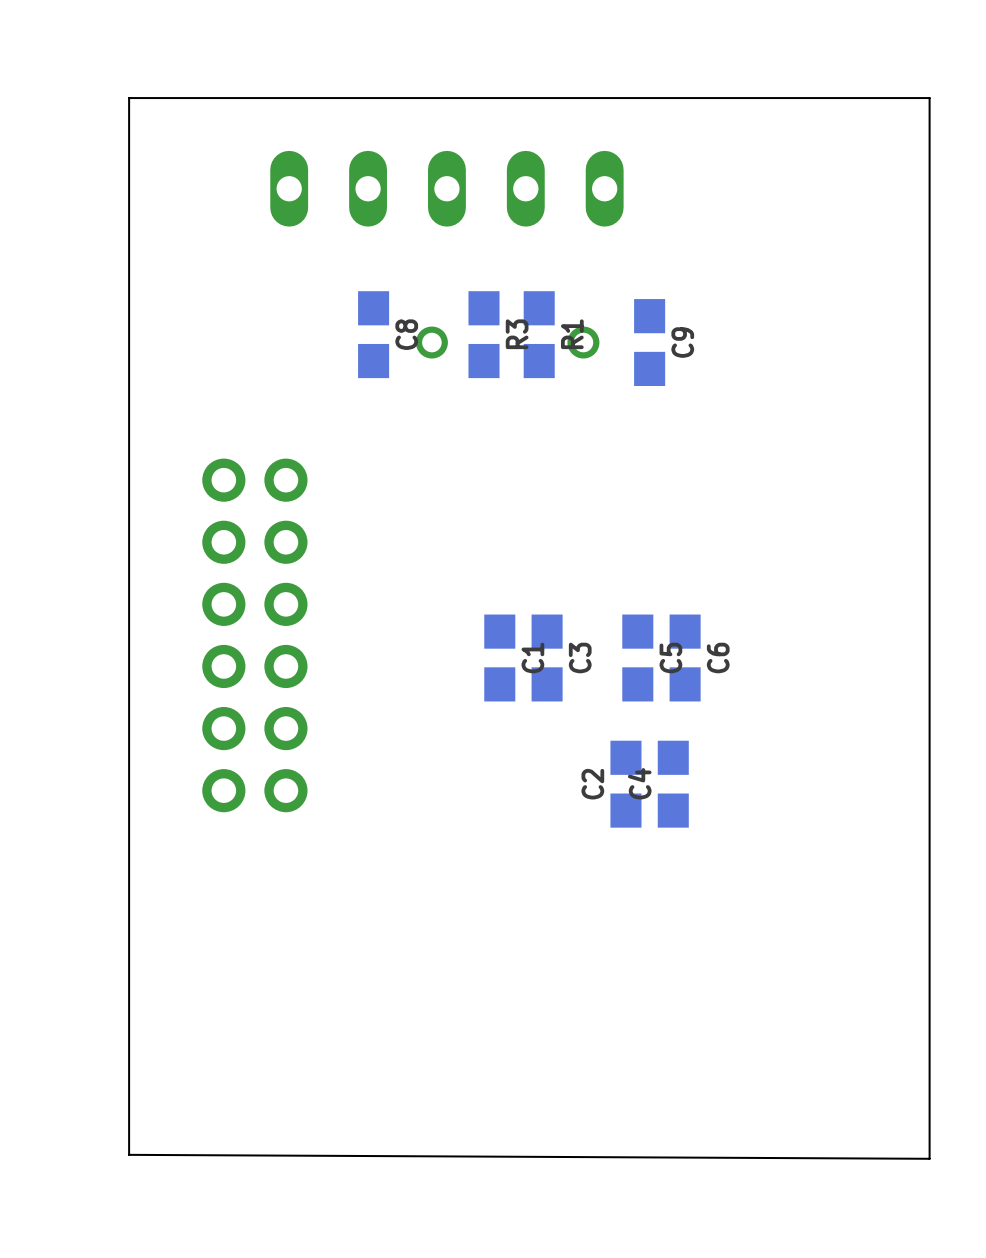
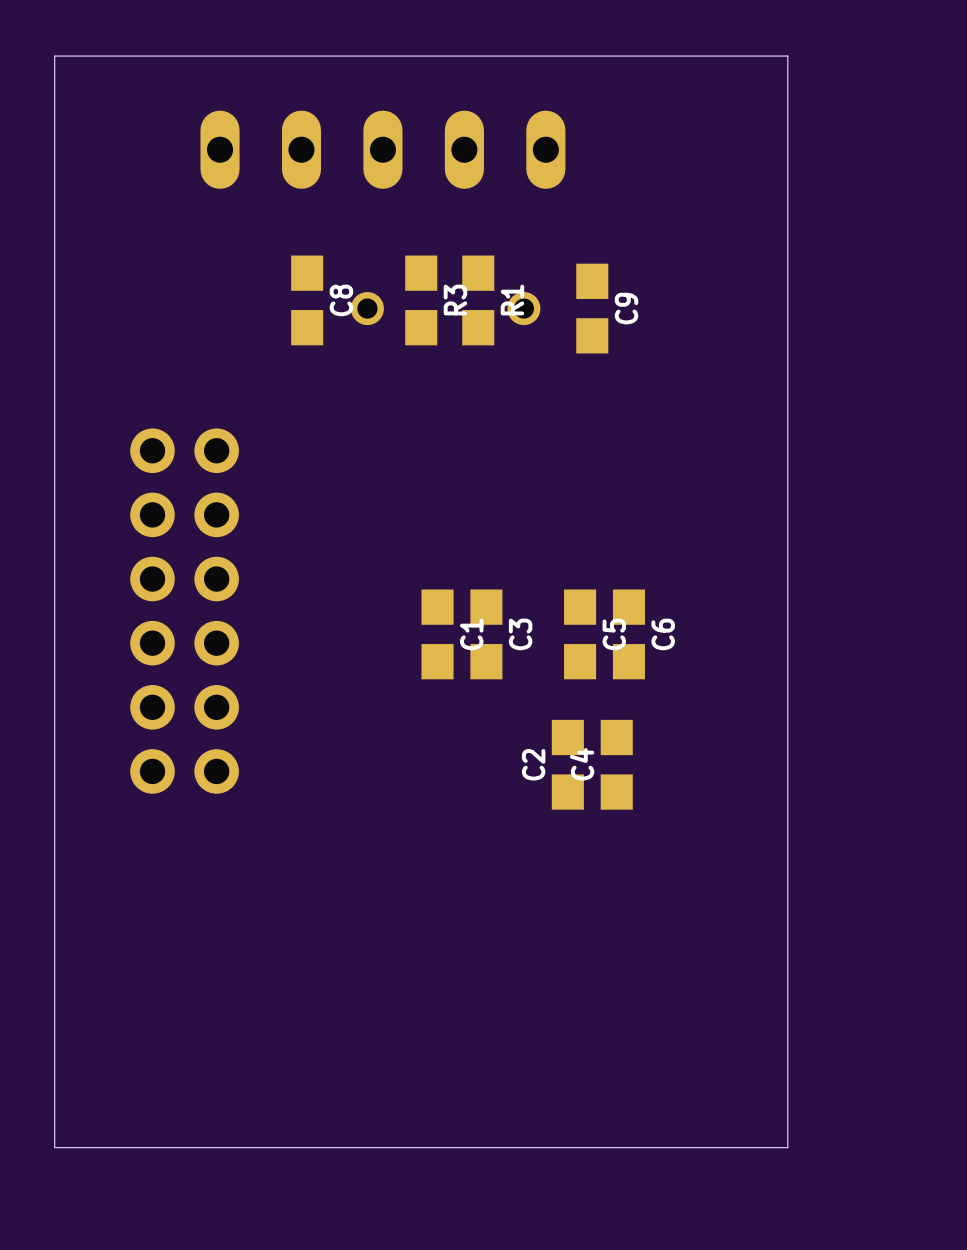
board edge: (838, 98) (929, 98) (929, 1158) (129, 1154) -> (787, 56) (787, 1147) (54, 1147)

